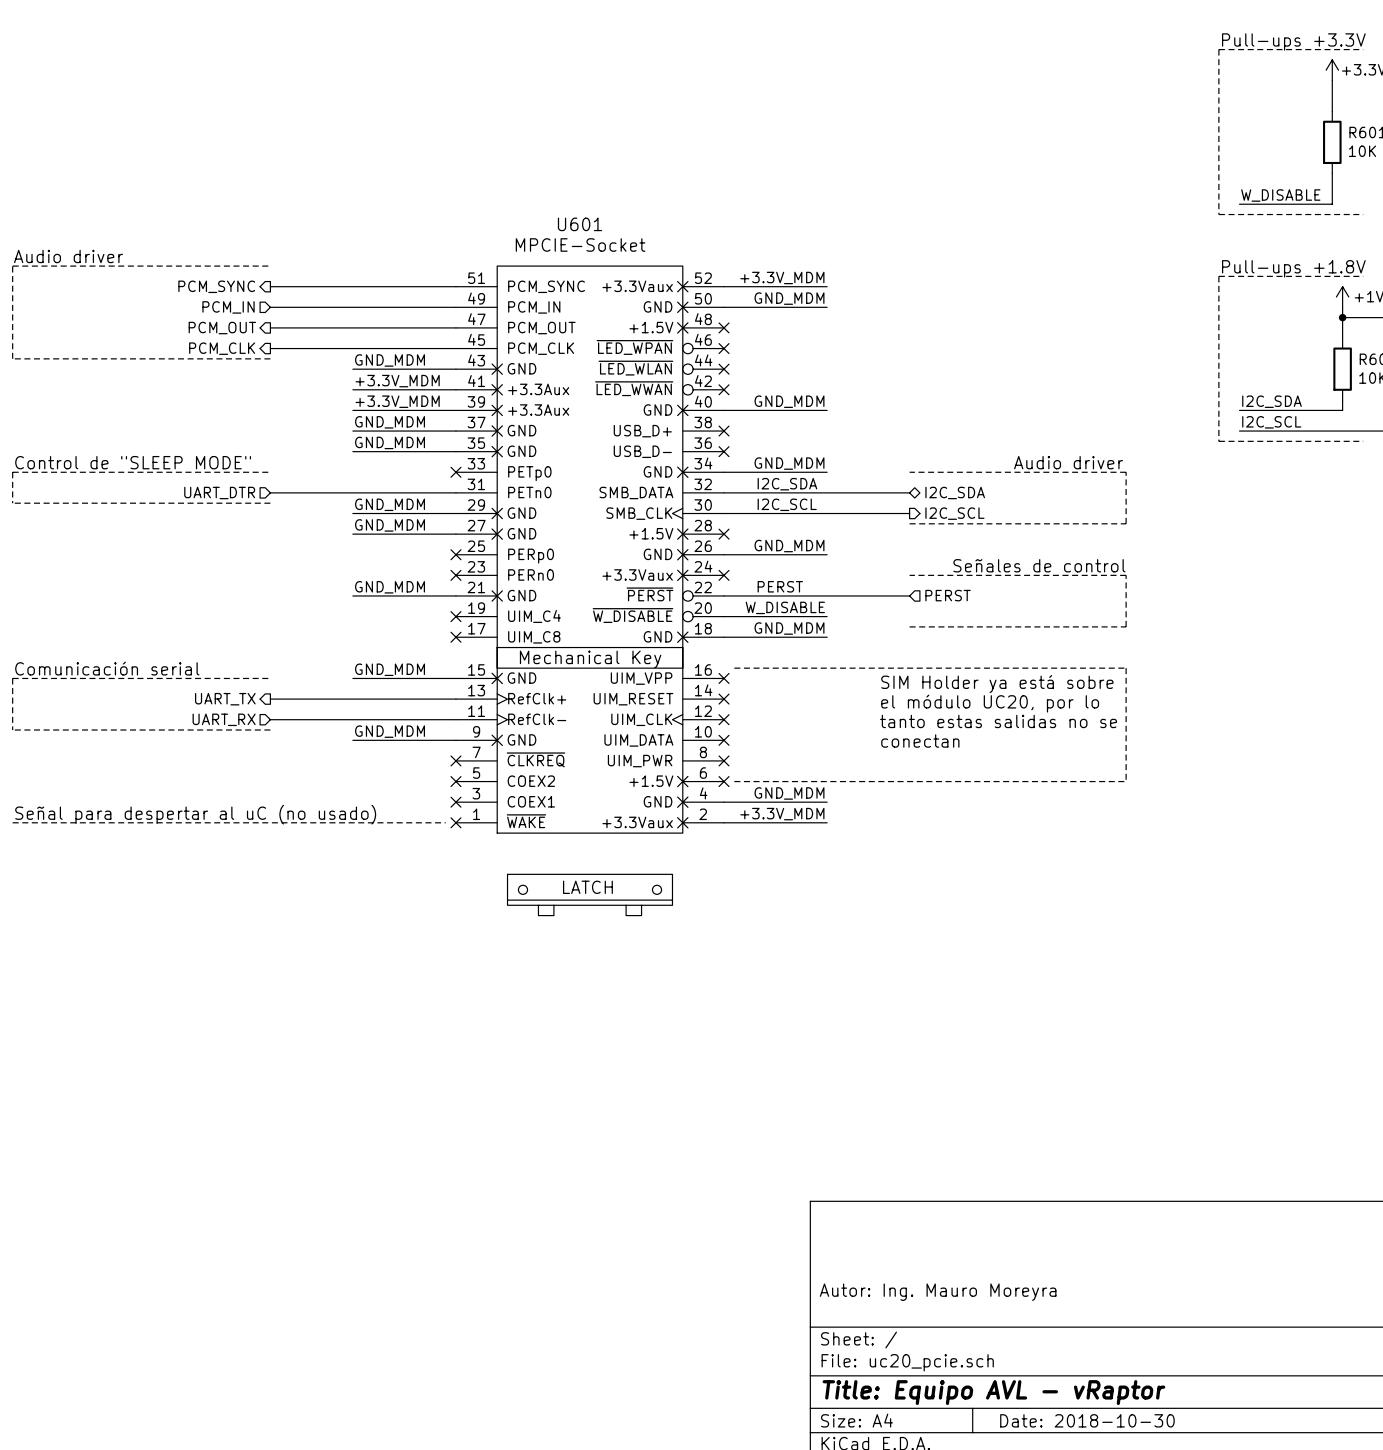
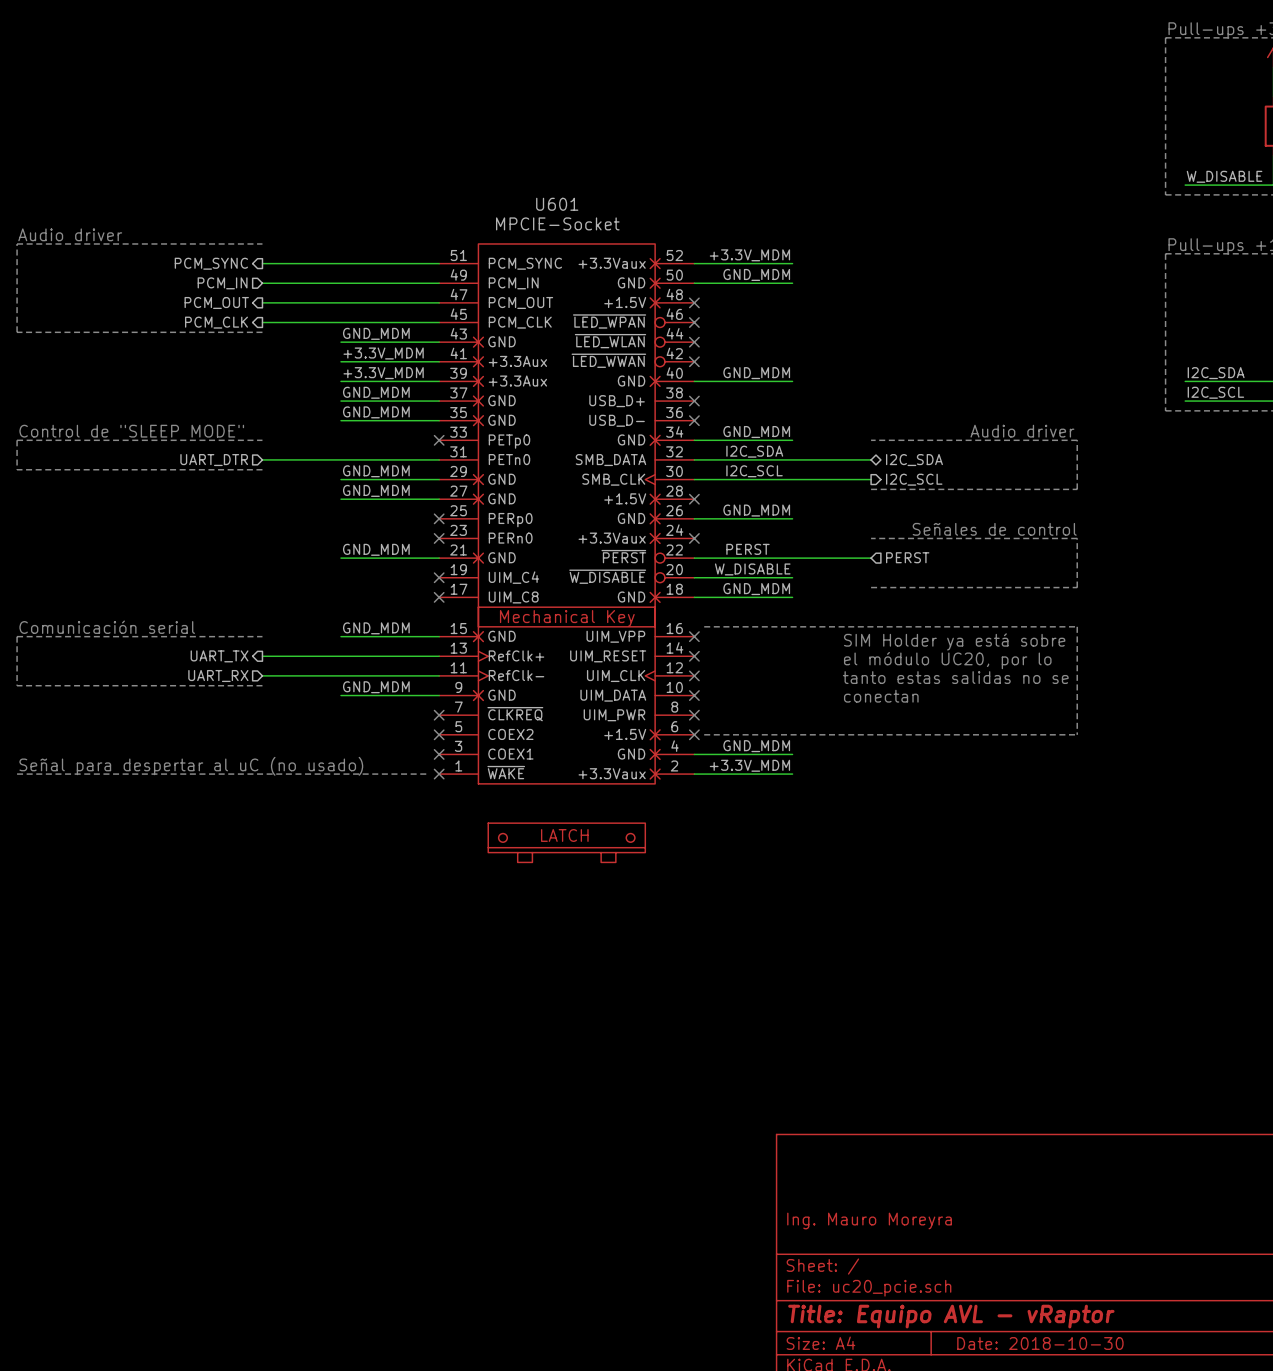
title block: Autor: Ing. Mauro Moreyra (938, 1292) -> Ing. Mauro Moreyra (869, 1220)

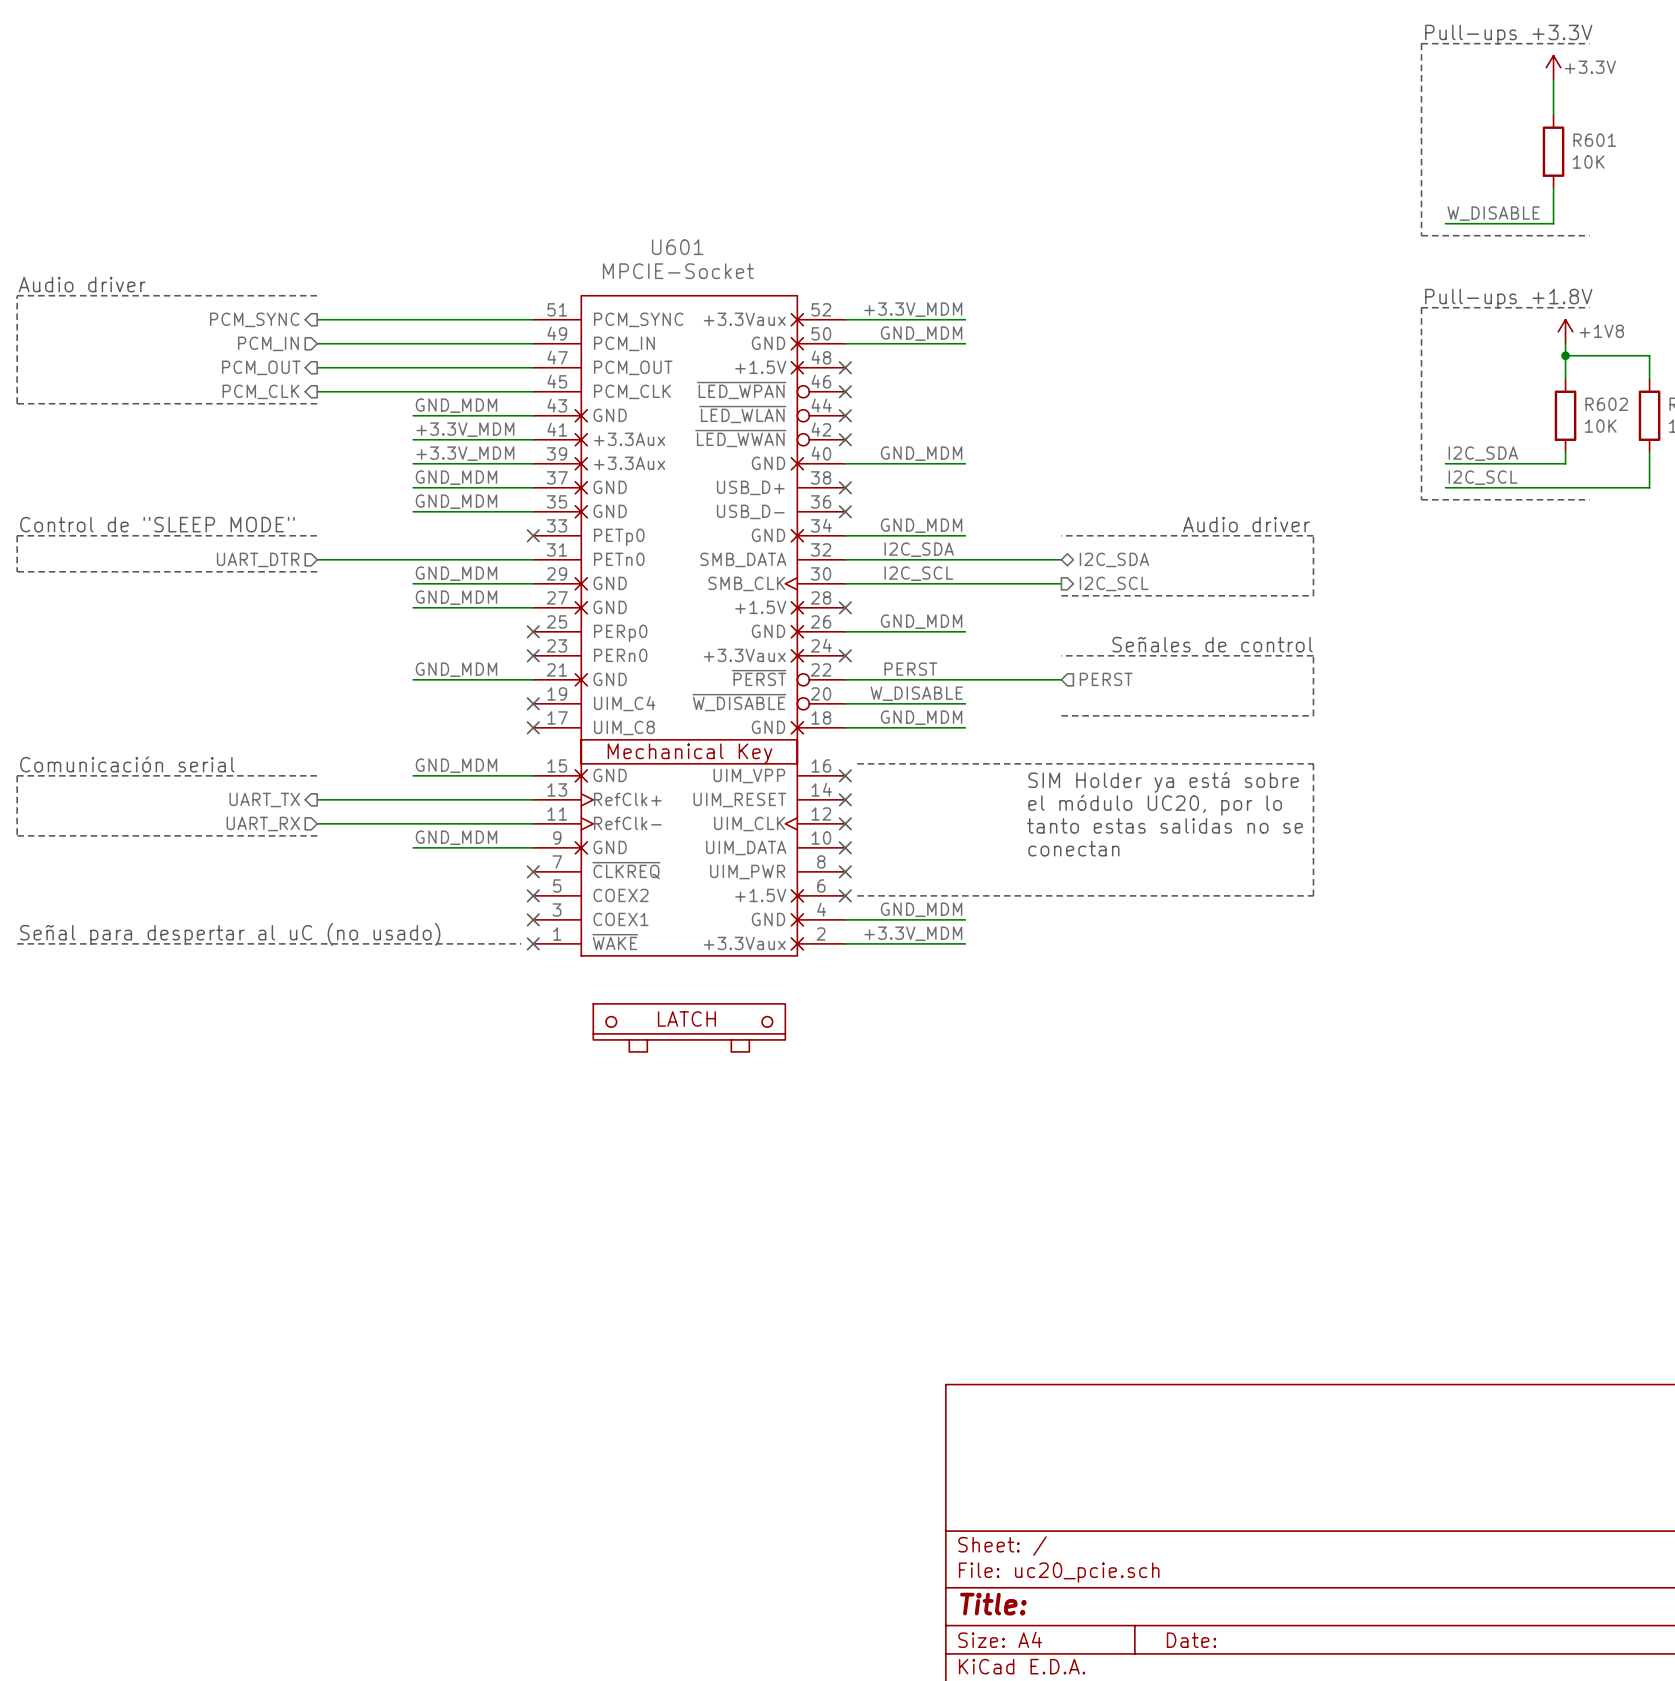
title block: Ing. Mauro Moreyra (869, 1220) -> none
title block: Title: Equipo AVL - vRaptor (951, 1316) -> Title: (993, 1604)
title block: Date: 2018-10-30 (1040, 1343) -> Date: (1191, 1640)

